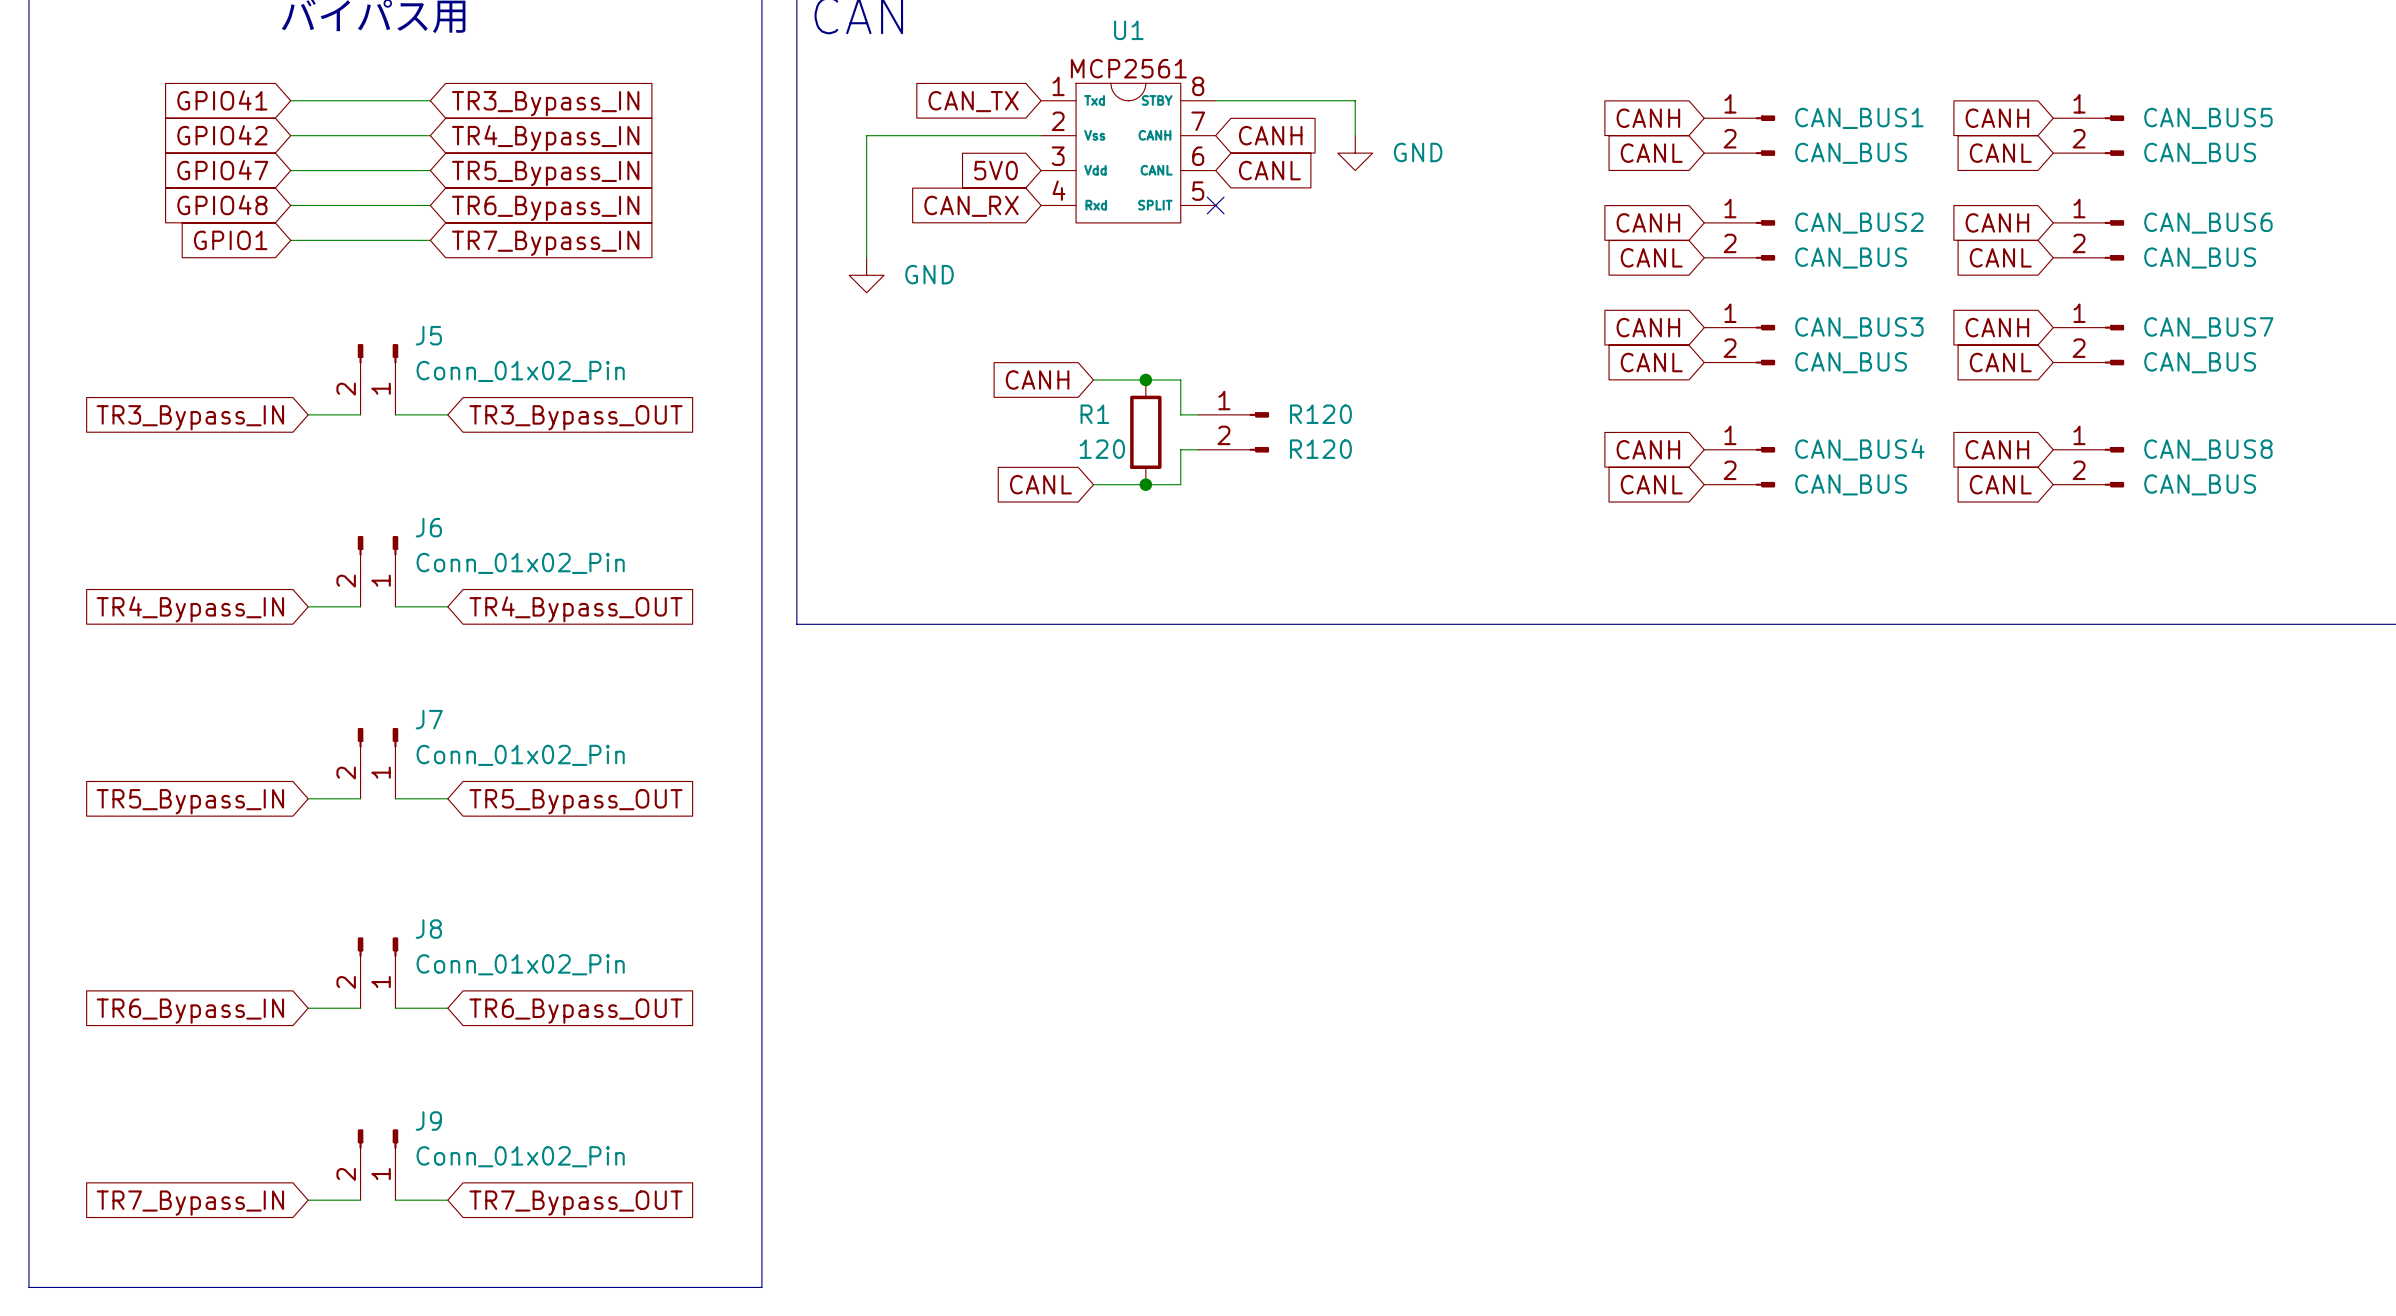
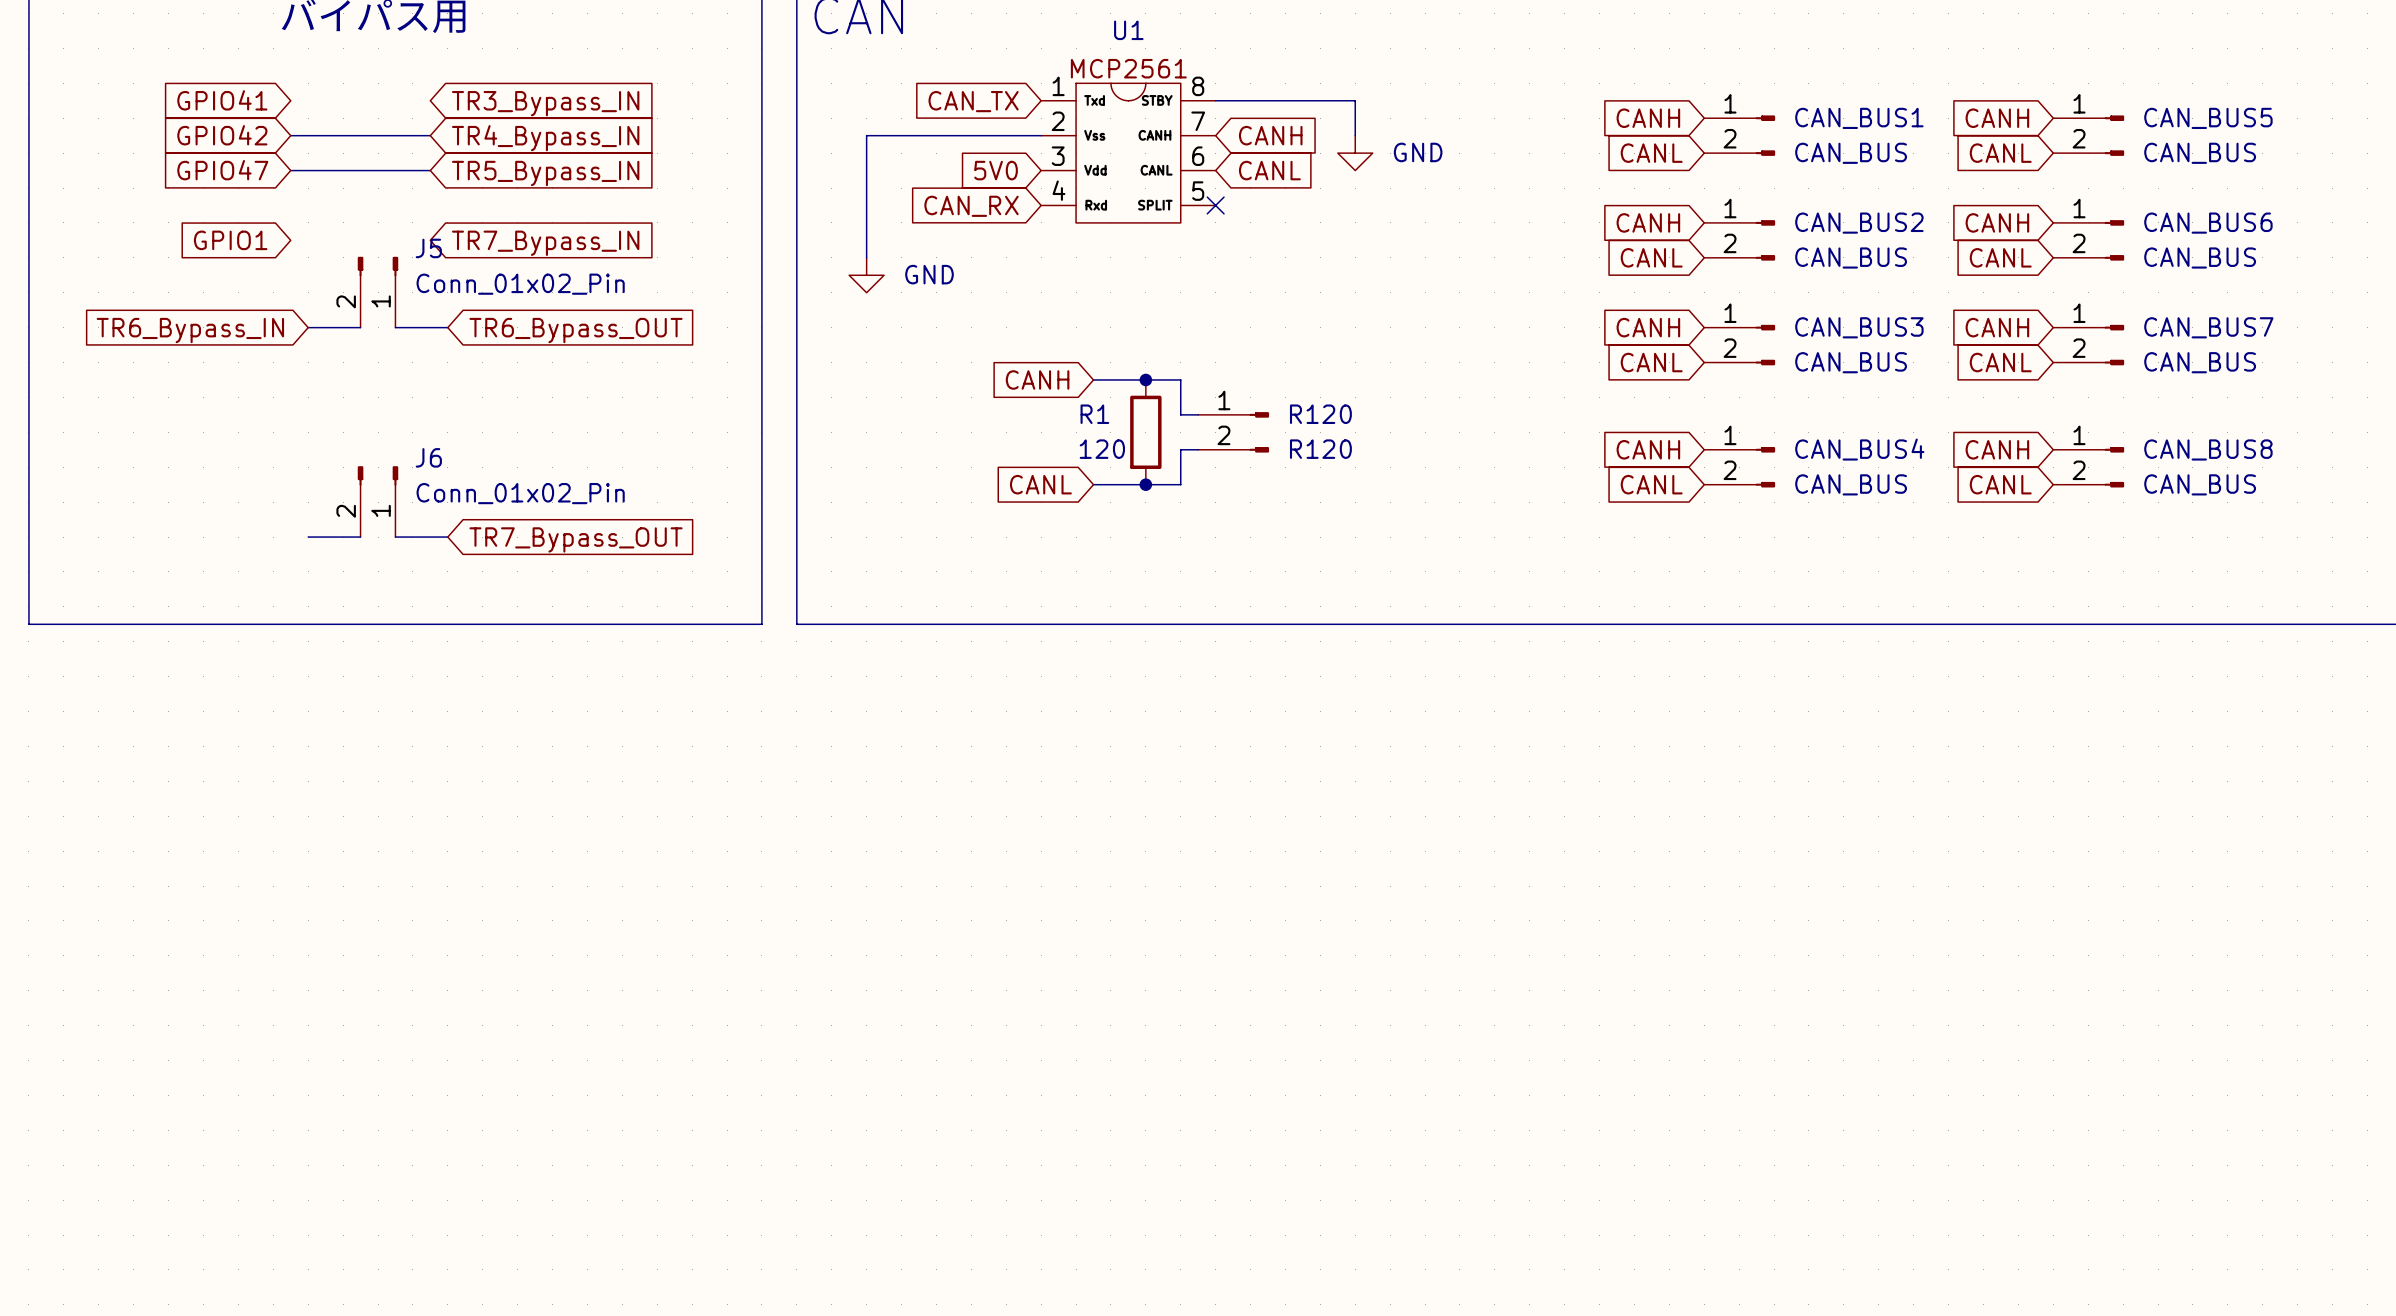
wire: (290, 100) (430, 100) -> none
global label: GPIO48 (222, 205) -> none
wire: (290, 205) (430, 205) -> none
global label rotation: 0° (545, 208) -> 180° (190, 330)
global label position: TR6_Bypass_IN (545, 208) -> TR6_Bypass_IN (190, 330)
wire: (290, 240) (430, 240) -> none
global label: none -> TR6_Bypass_OUT (576, 330)
J5 position: (378, 379) -> (378, 292)
wire: (308, 414) (360, 414) -> (308, 327) (360, 327)
wire: (395, 414) (447, 414) -> (395, 327) (447, 327)
global label: TR3_Bypass_IN (190, 417) -> none
global label: TR3_Bypass_OUT (576, 417) -> none
global label: none -> TR7_Bypass_OUT (576, 539)
J6 position: (378, 571) -> (378, 501)
wire: (308, 606) (360, 606) -> (308, 537) (360, 537)
wire: (395, 606) (447, 606) -> (395, 537) (447, 537)
global label: TR4_Bypass_IN (190, 609) -> none
global label: TR4_Bypass_OUT (576, 609) -> none
line: (28, 624) (28, 1287) (761, 1287) (761, 624) -> (28, 624) (761, 624)
J7: Conn_01x02_Pin (378, 763) -> none
wire: (308, 798) (360, 798) -> none
wire: (395, 798) (447, 798) -> none
global label: TR5_Bypass_IN (190, 801) -> none
global label: TR5_Bypass_OUT (576, 801) -> none
J8: Conn_01x02_Pin (378, 972) -> none
wire: (308, 1008) (360, 1008) -> none
wire: (395, 1008) (447, 1008) -> none
global label: TR6_Bypass_IN (190, 1011) -> none
global label: TR6_Bypass_OUT (576, 1011) -> none
J9: Conn_01x02_Pin (378, 1164) -> none
wire: (308, 1200) (360, 1200) -> none
wire: (395, 1200) (447, 1200) -> none
global label: TR7_Bypass_IN (190, 1203) -> none
global label: TR7_Bypass_OUT (576, 1203) -> none

